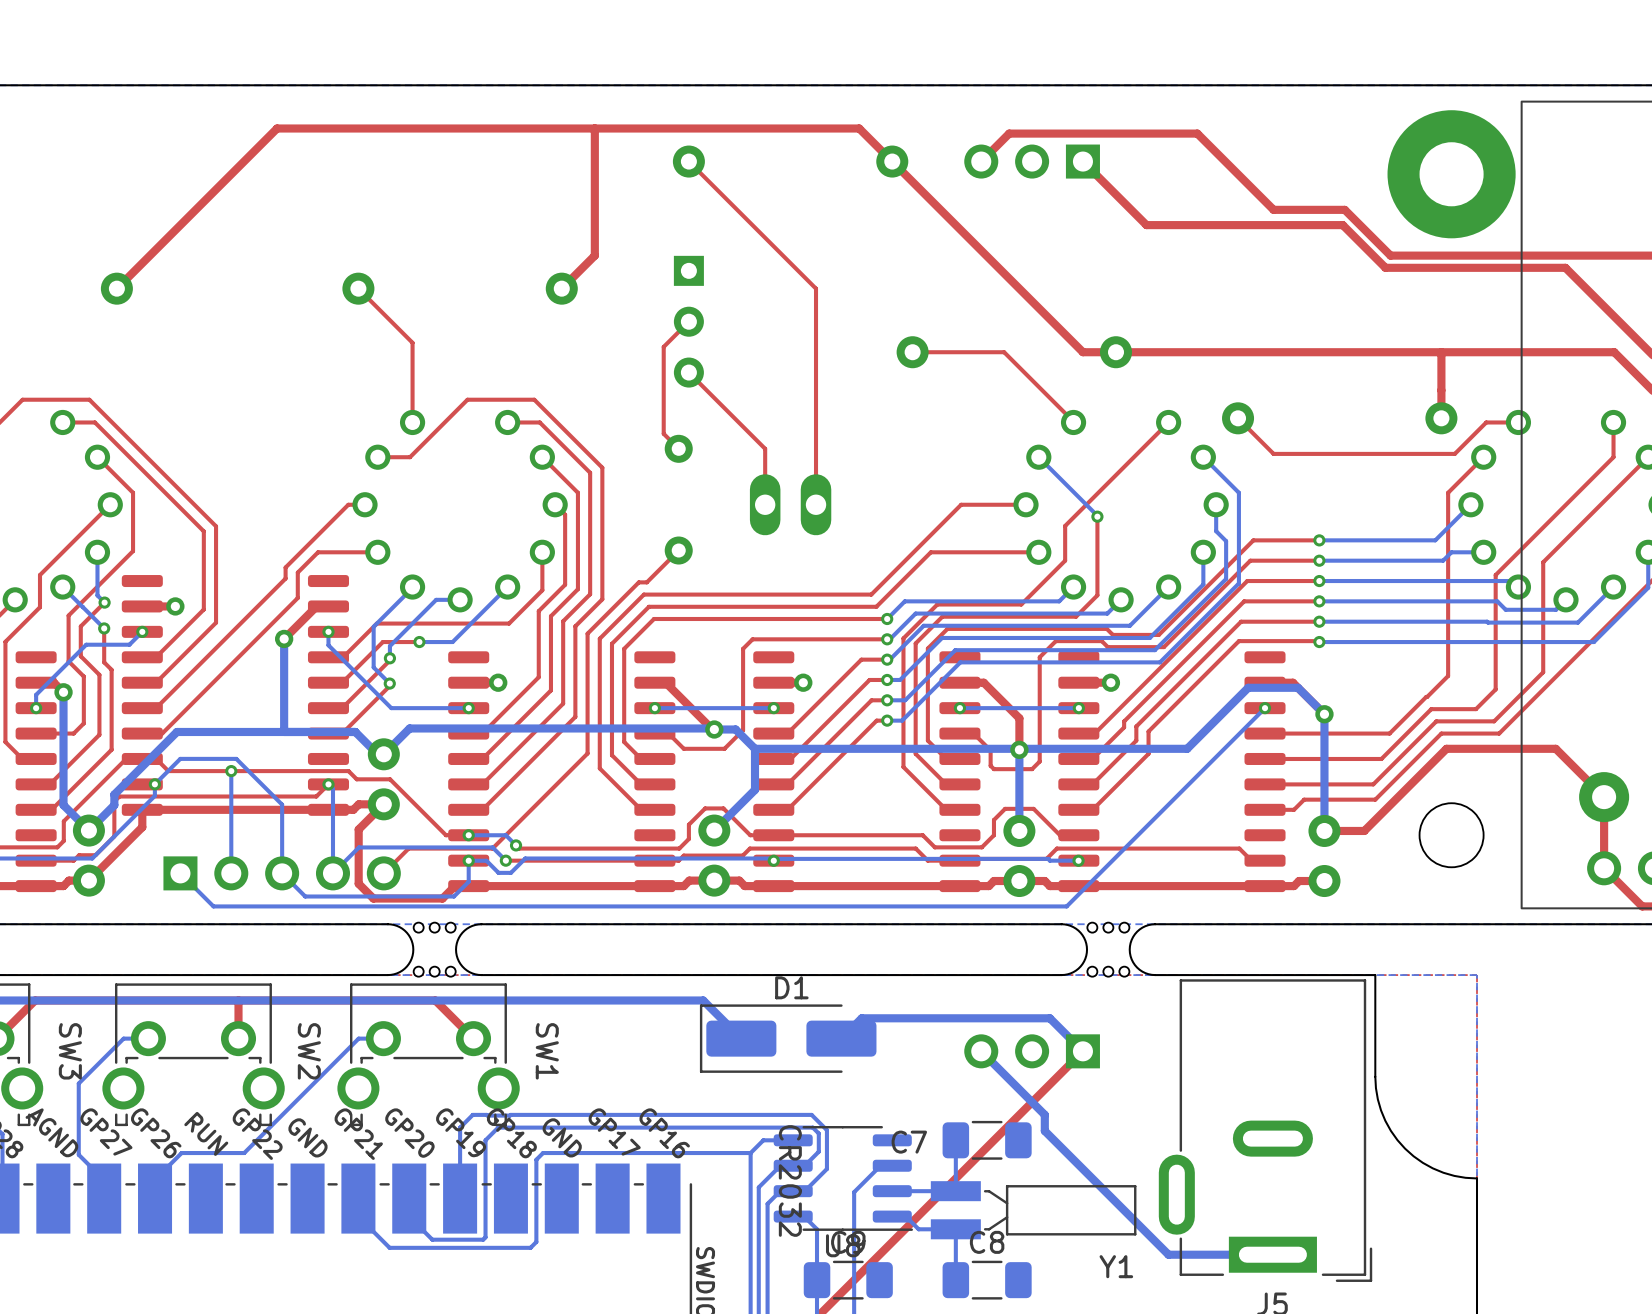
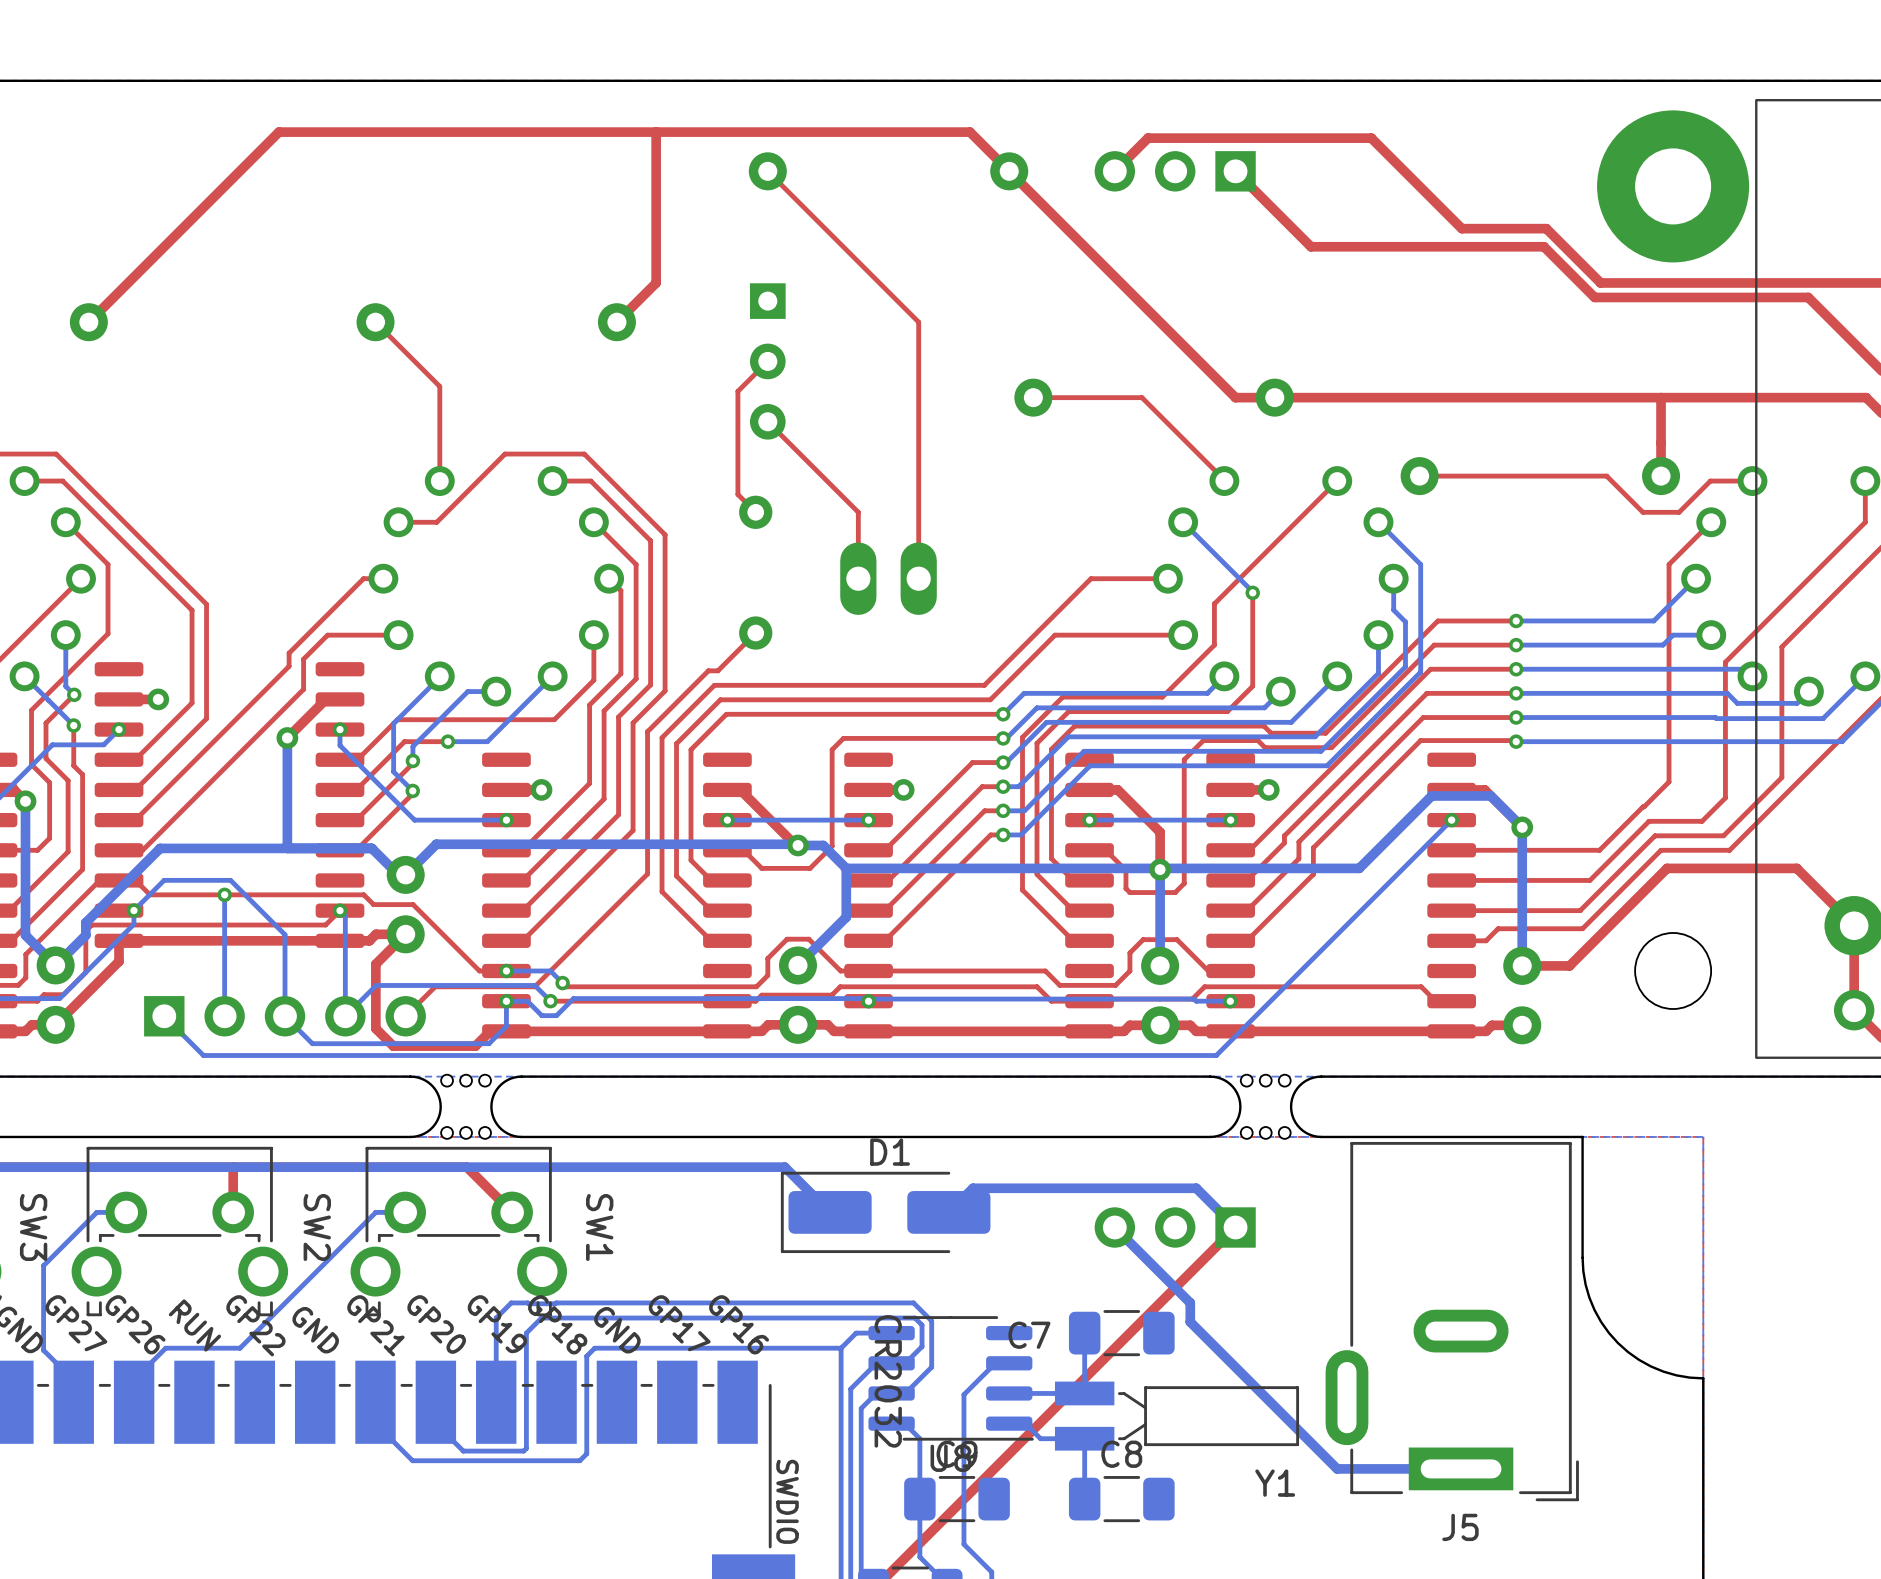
top track: (1238, 418) (1273, 453) (1454, 453) (1486, 422) -> (1419, 476) (1606, 476) (1642, 512) (1679, 512) (1710, 481) (1714, 481)

